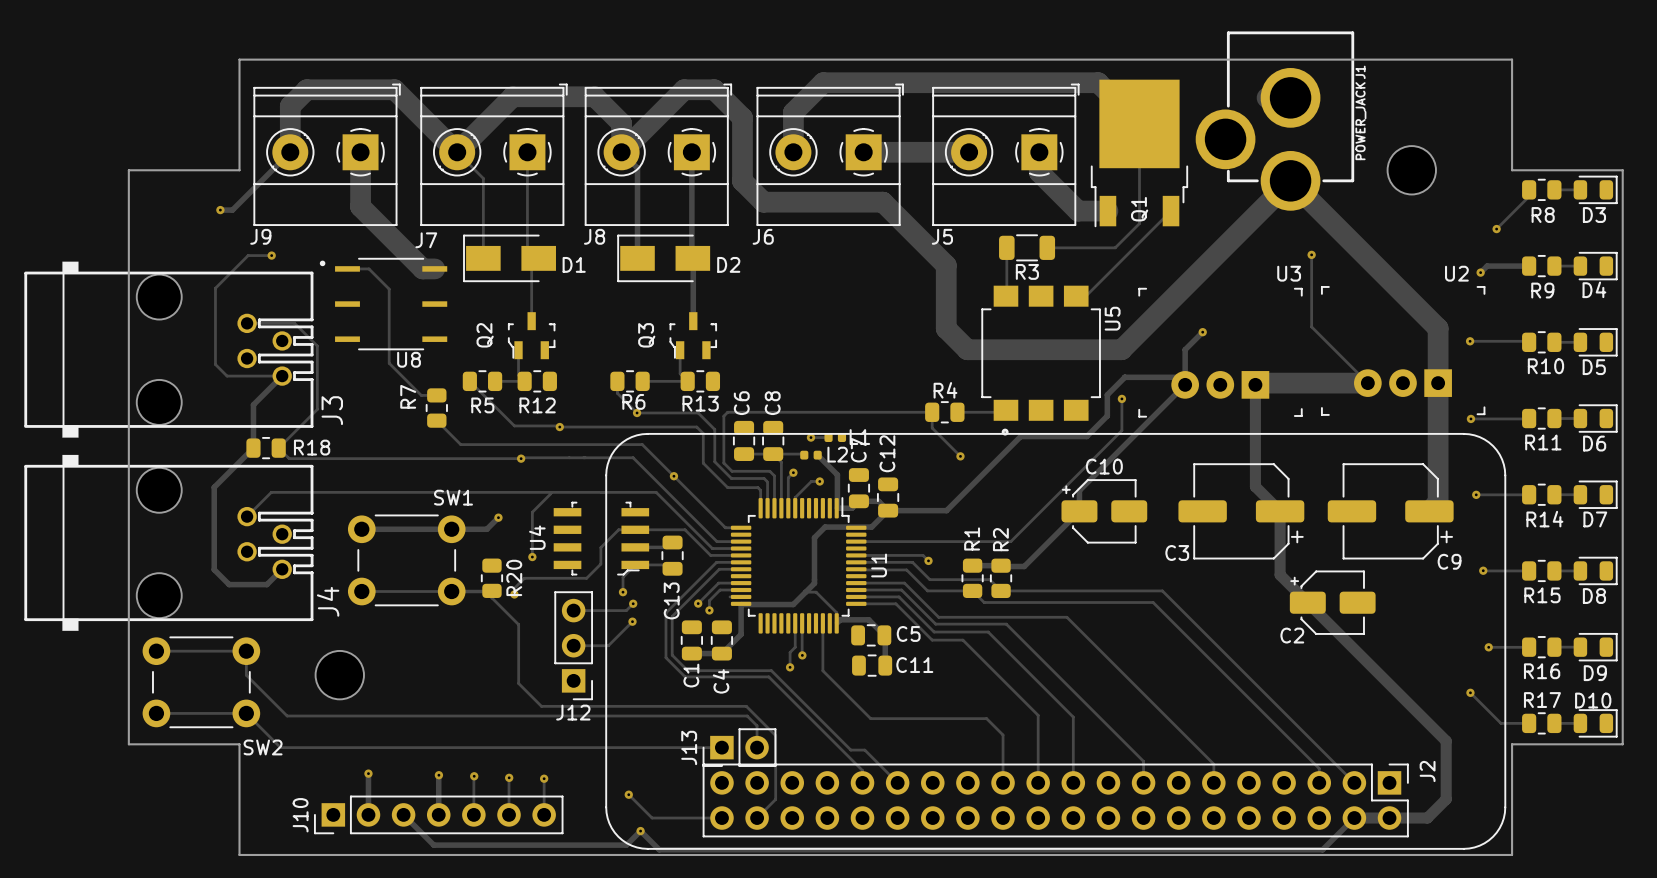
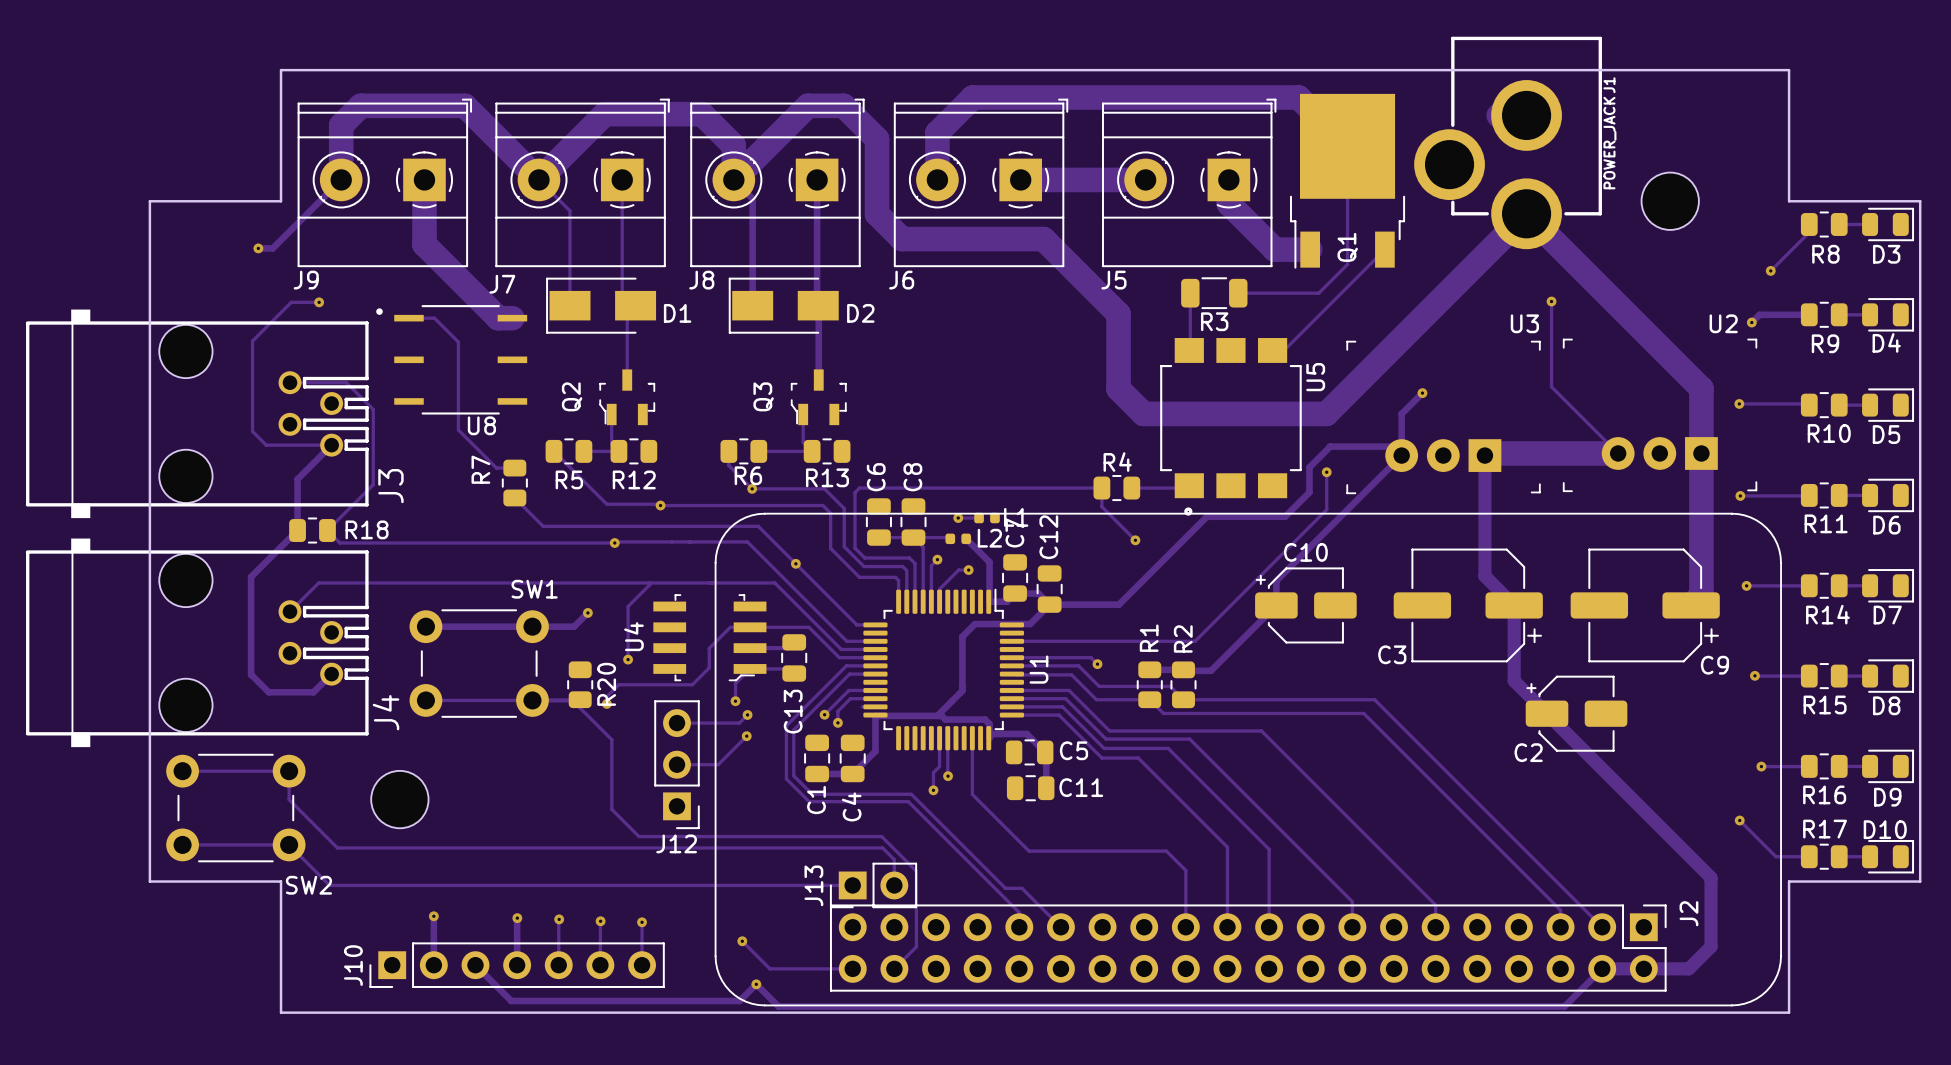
track: (805, 592) (816, 592) (836, 612) (836, 623) -> none
track: none -> (937, 715) (941, 715) (945, 719) (985, 719) (989, 724) (989, 738)

